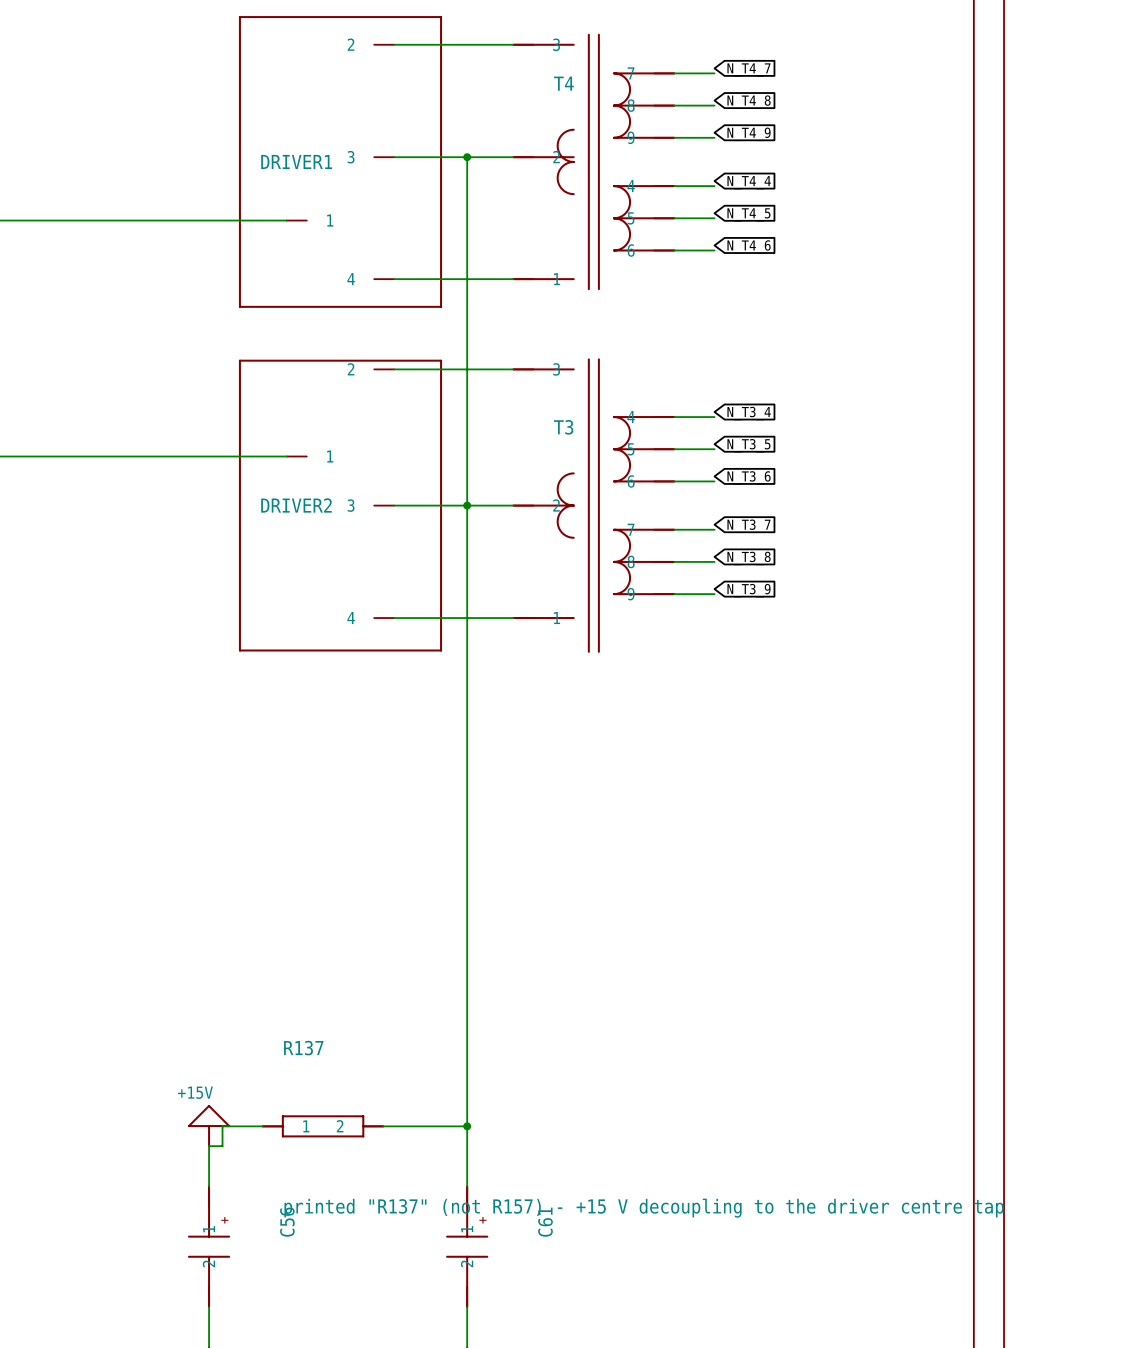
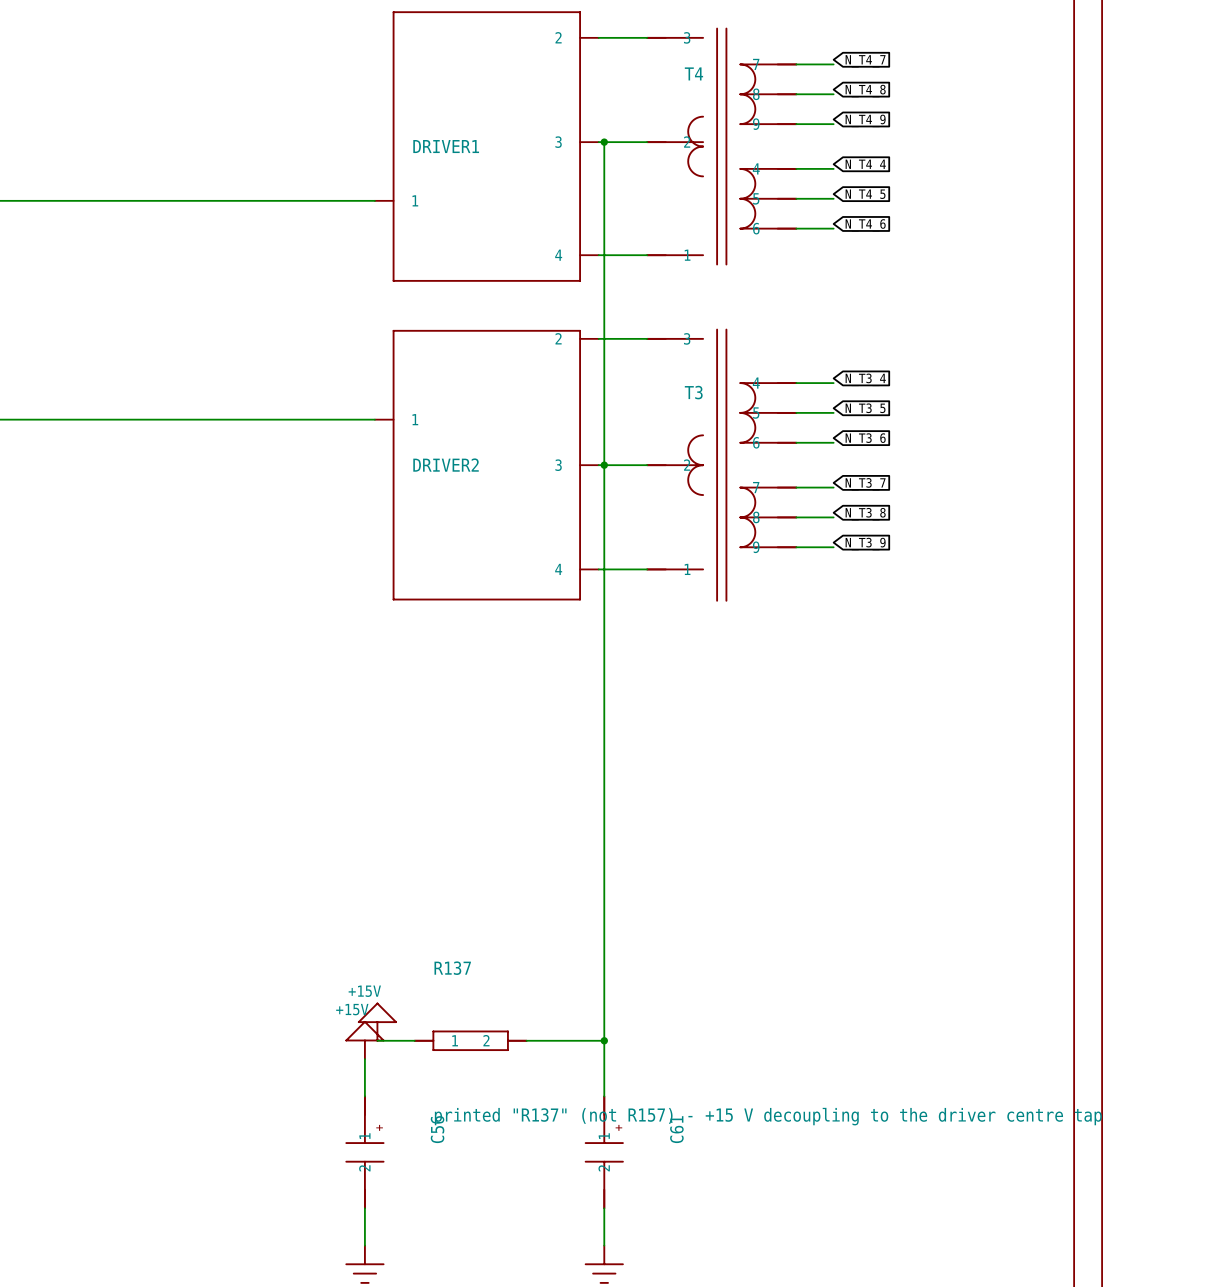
DRIVER1 symbol: [238, 16, 443, 308] -> [374, 11, 599, 282]
wire: (394, 44) (461, 44) -> none
wire: (394, 157) (461, 157) -> none
wire: (219, 220) (286, 220) -> none
wire: (394, 279) (461, 279) -> none
DRIVER2 symbol: [238, 359, 443, 652] -> [374, 329, 599, 601]
wire: (394, 369) (461, 369) -> none
wire: (219, 456) (286, 456) -> none
wire: (394, 505) (461, 505) -> none
wire: (394, 618) (461, 618) -> none
power symbol: none -> (377, 1022)
wire: (222, 1126) (222, 1146) (209, 1146) -> none

